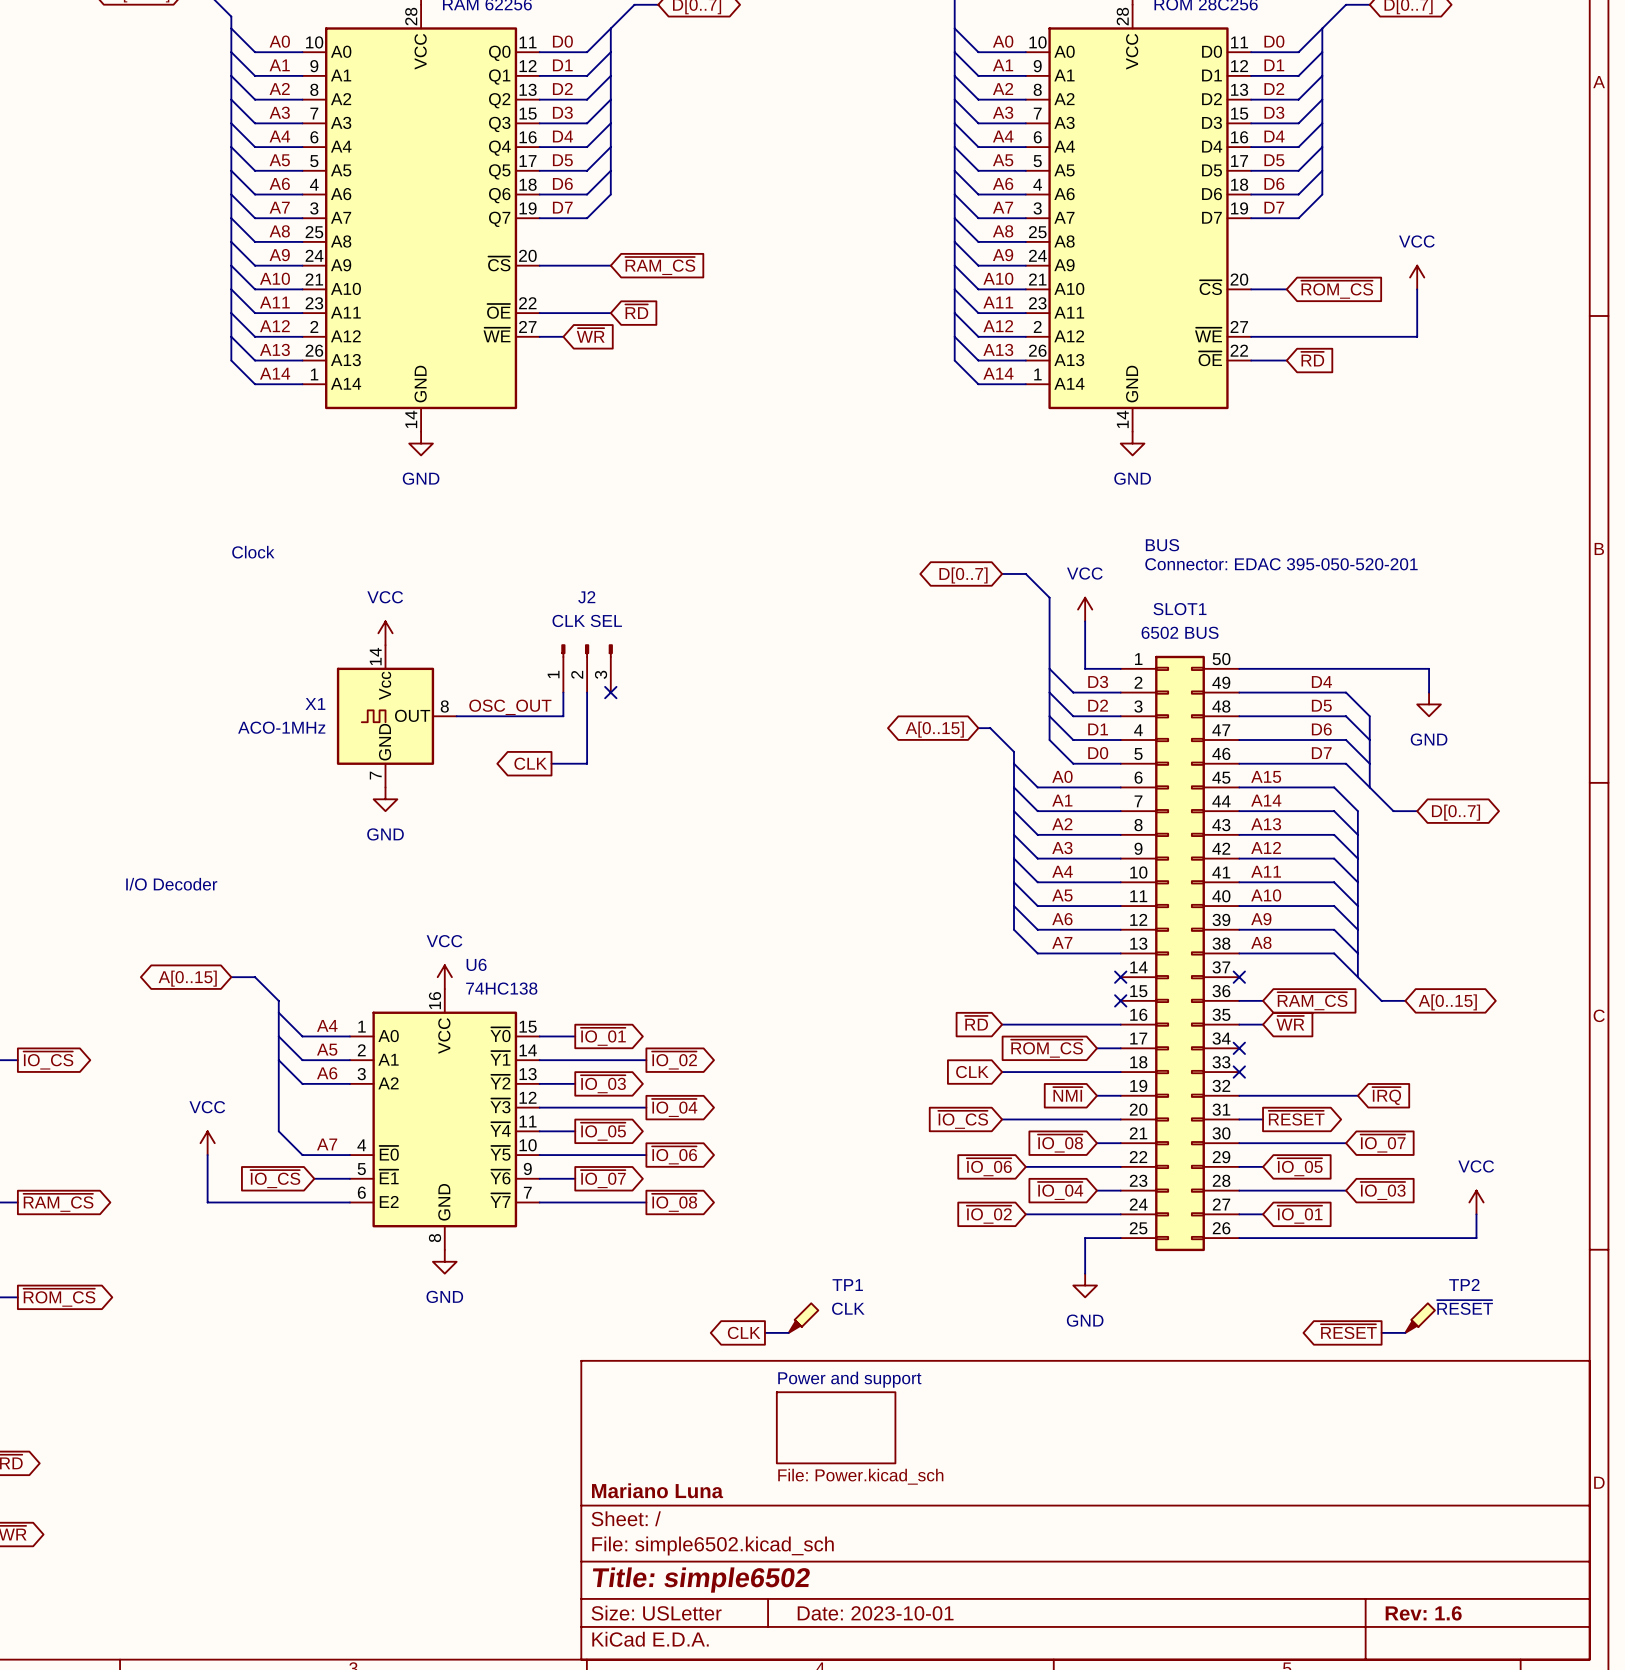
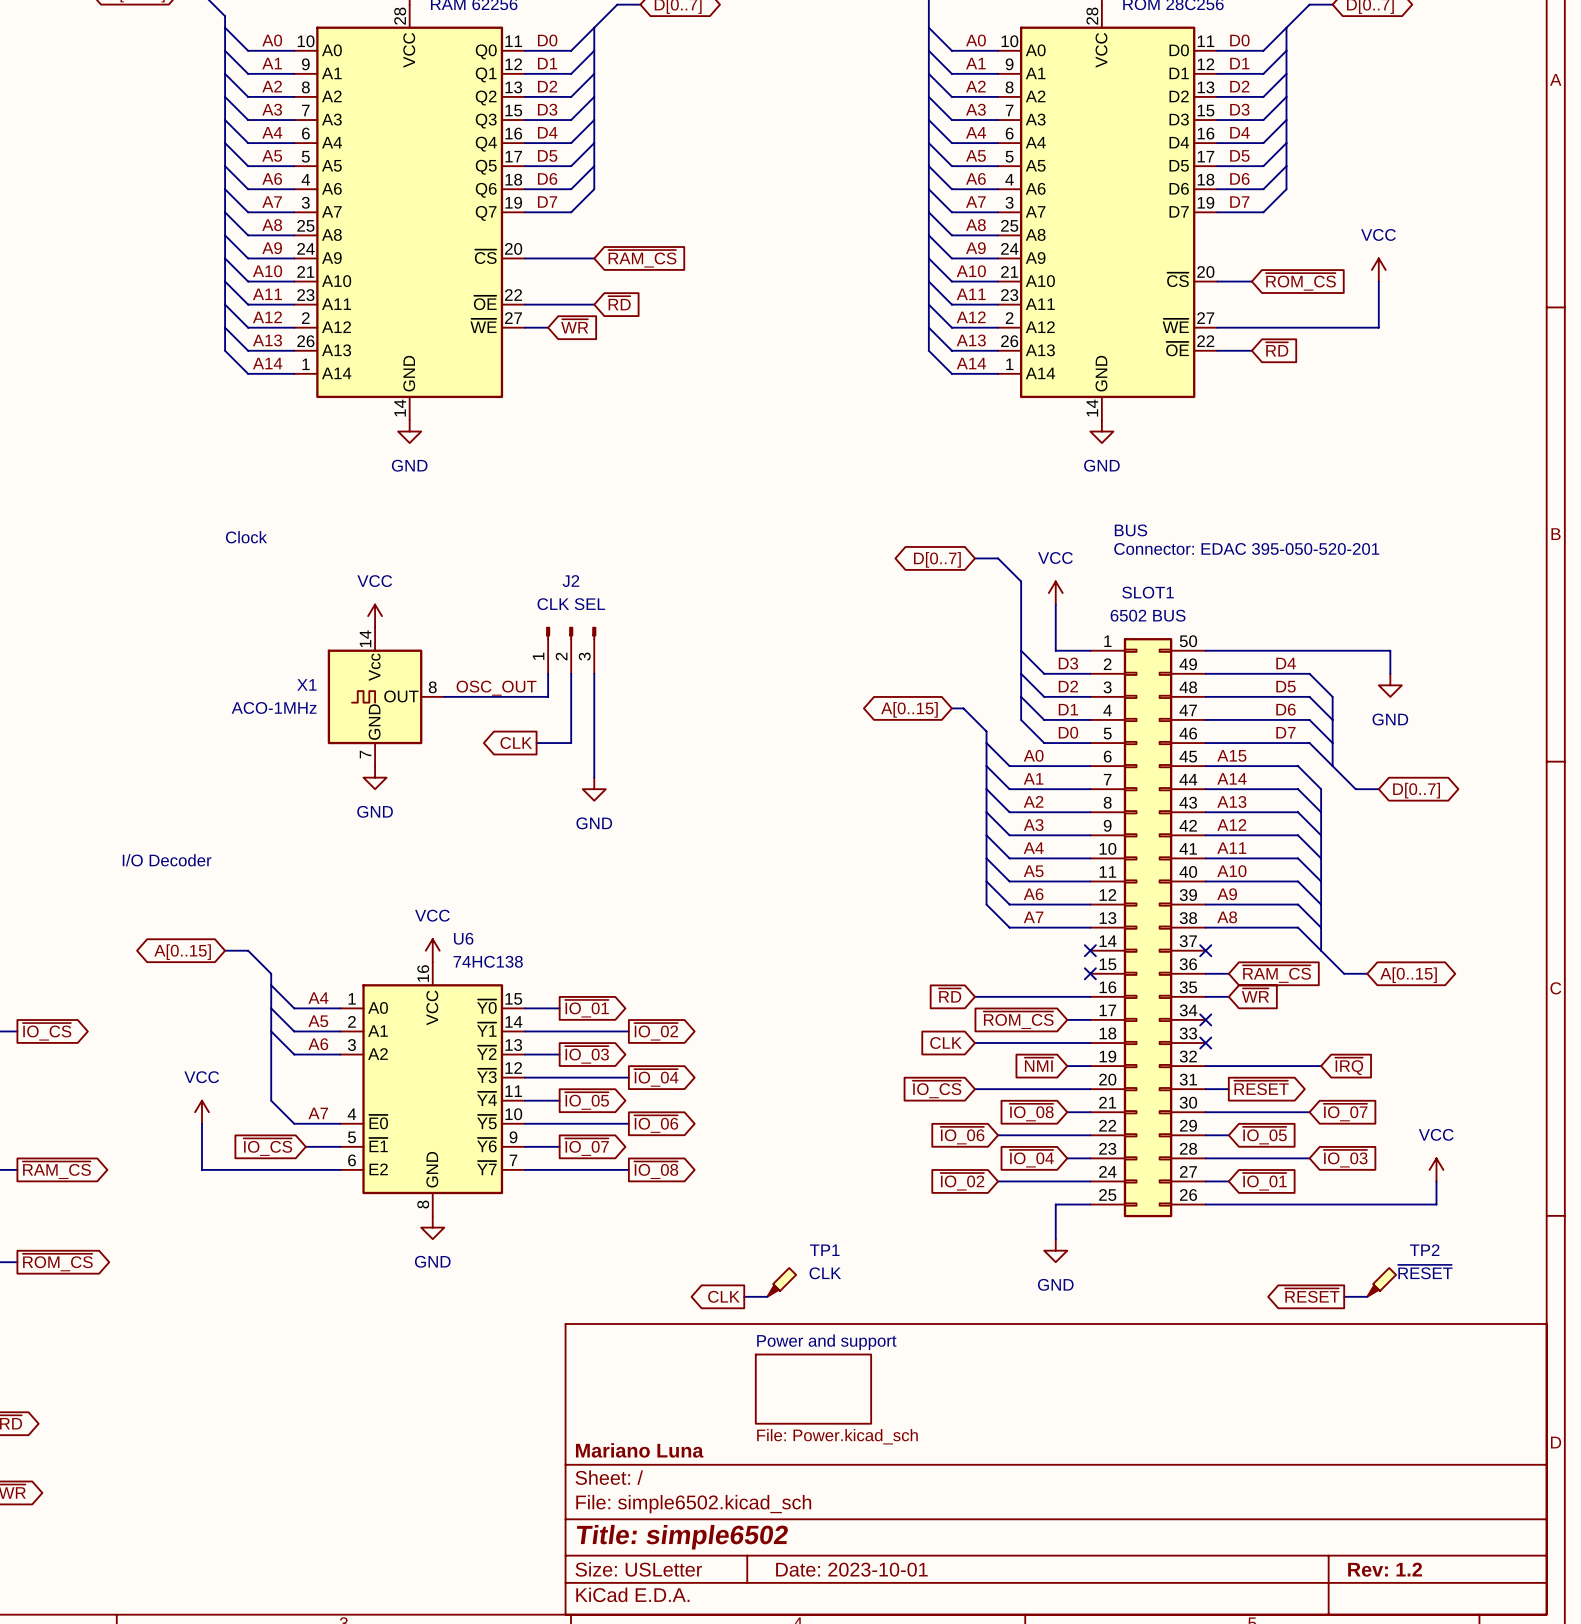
wire: none -> (594, 673) (594, 777)
no-connect mark: (610, 692) -> none
power symbol: none -> GND (594, 789)
title block: Rev: 1.6 (1423, 1613) -> Rev: 1.2 (1385, 1569)

